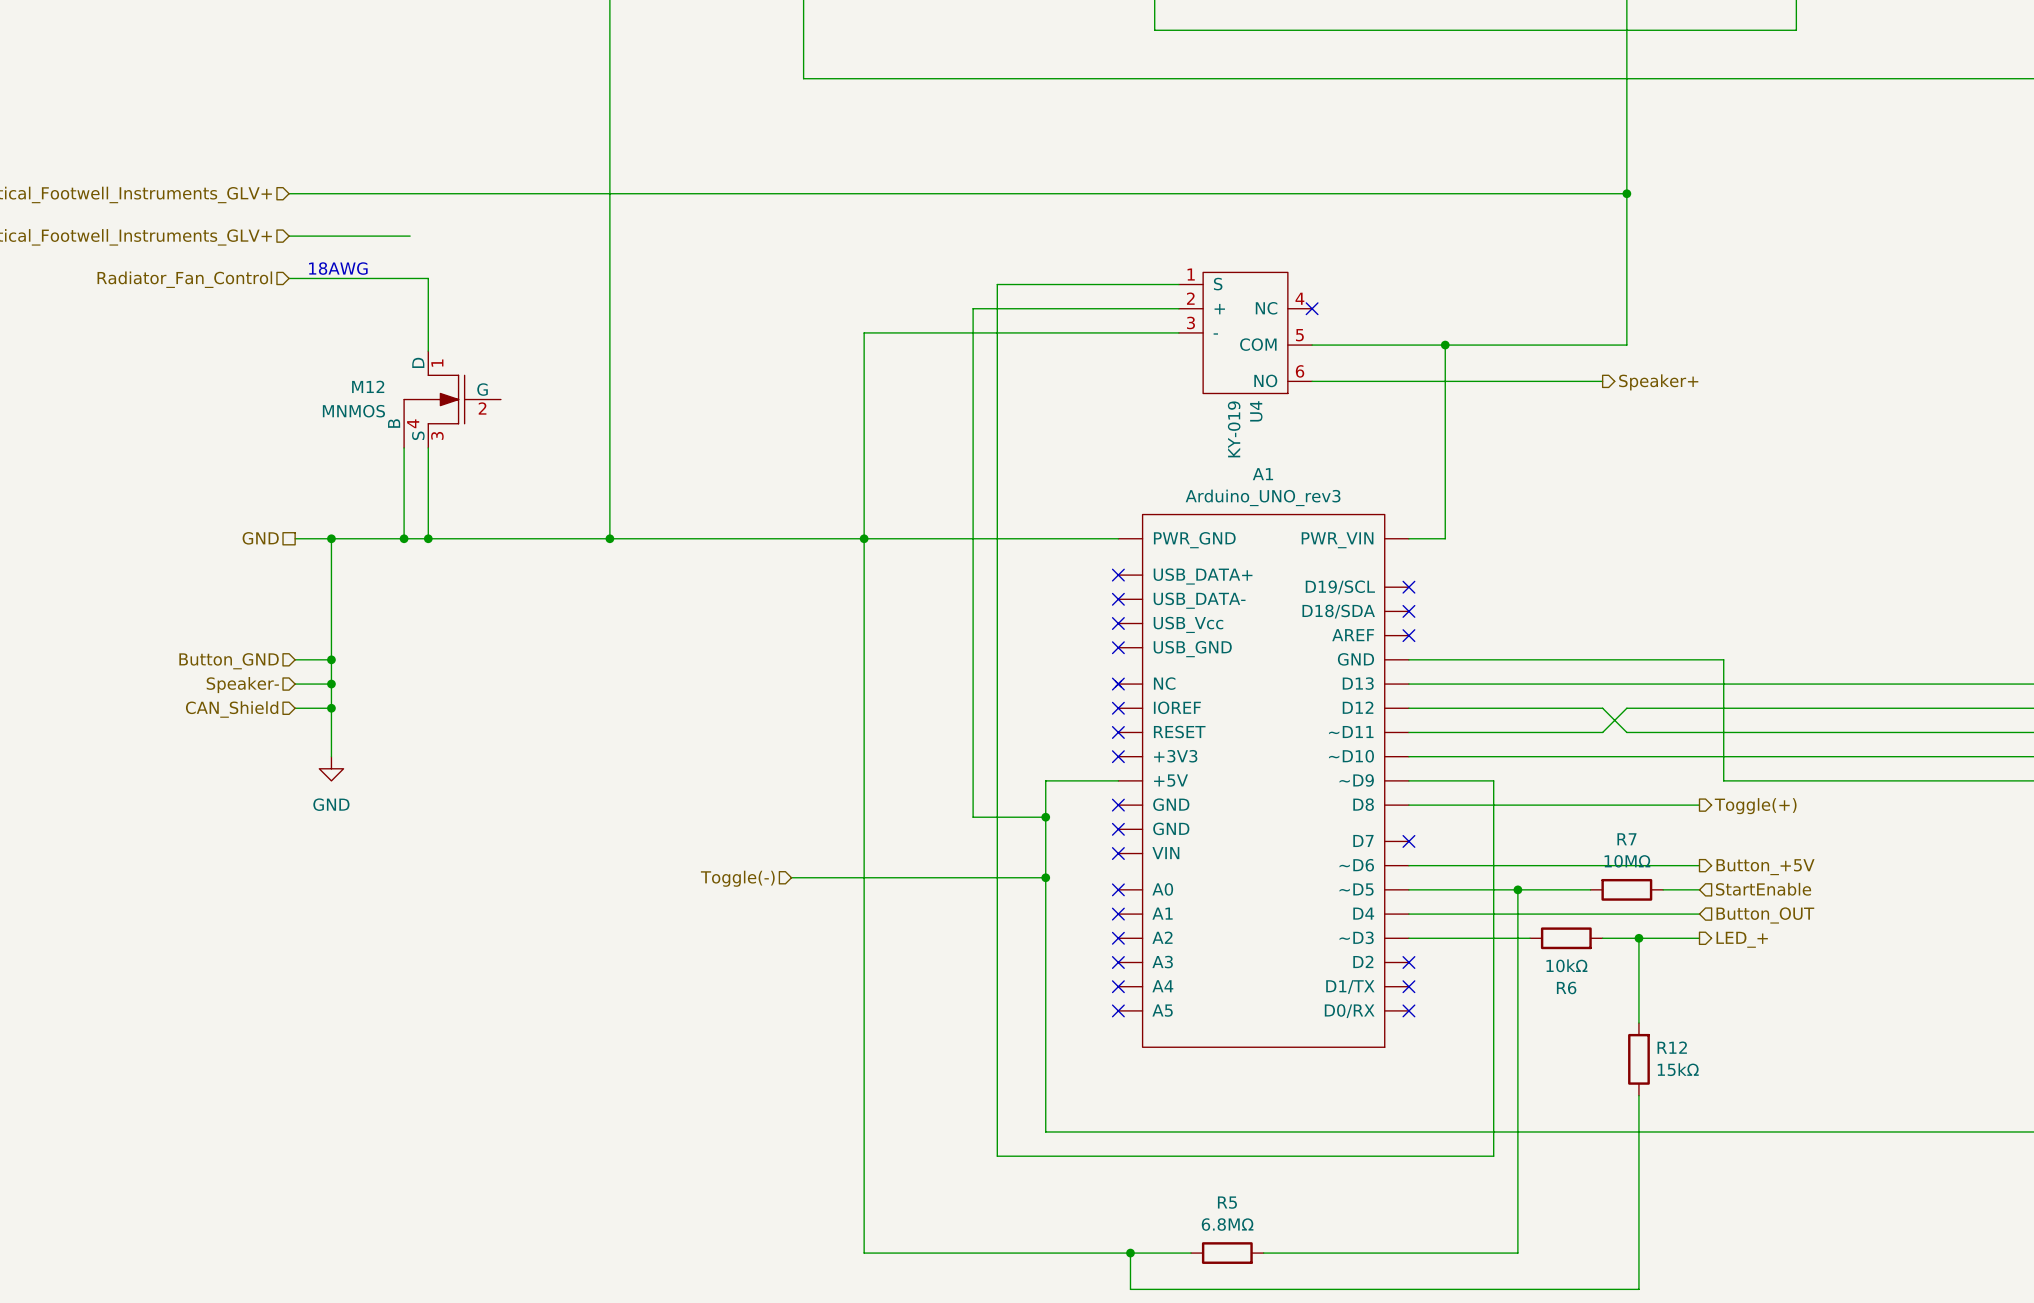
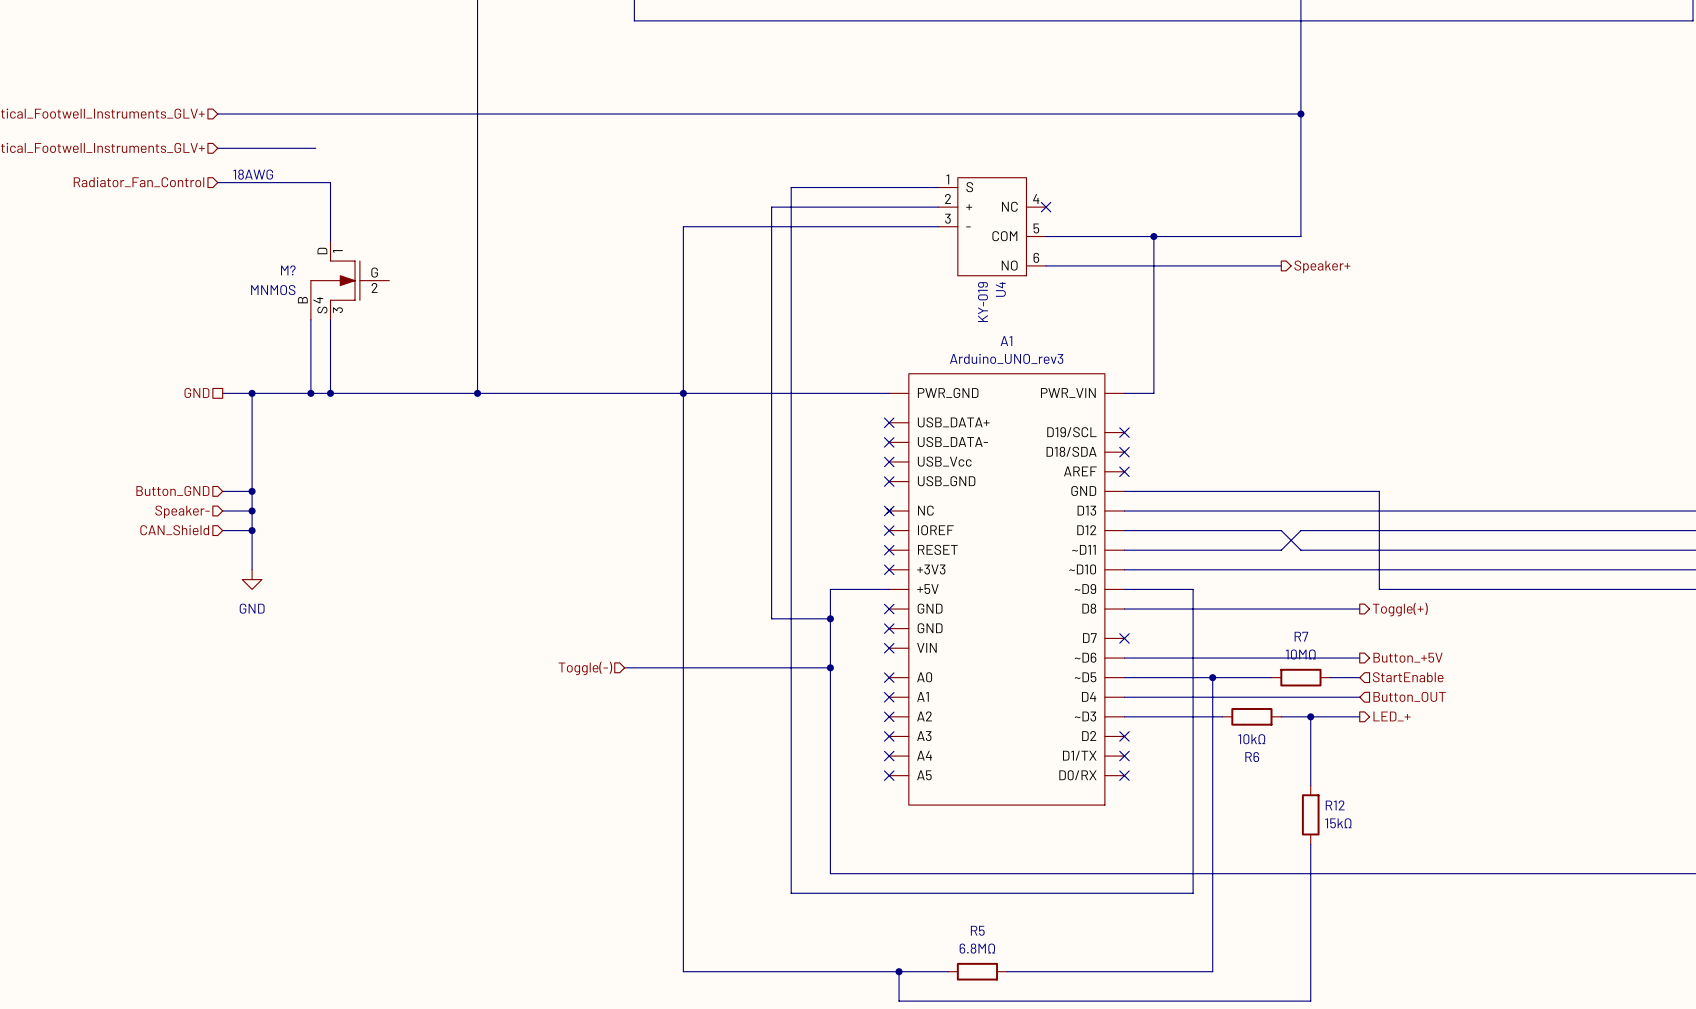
M12 name: M12 (368, 386) -> M? (288, 270)

